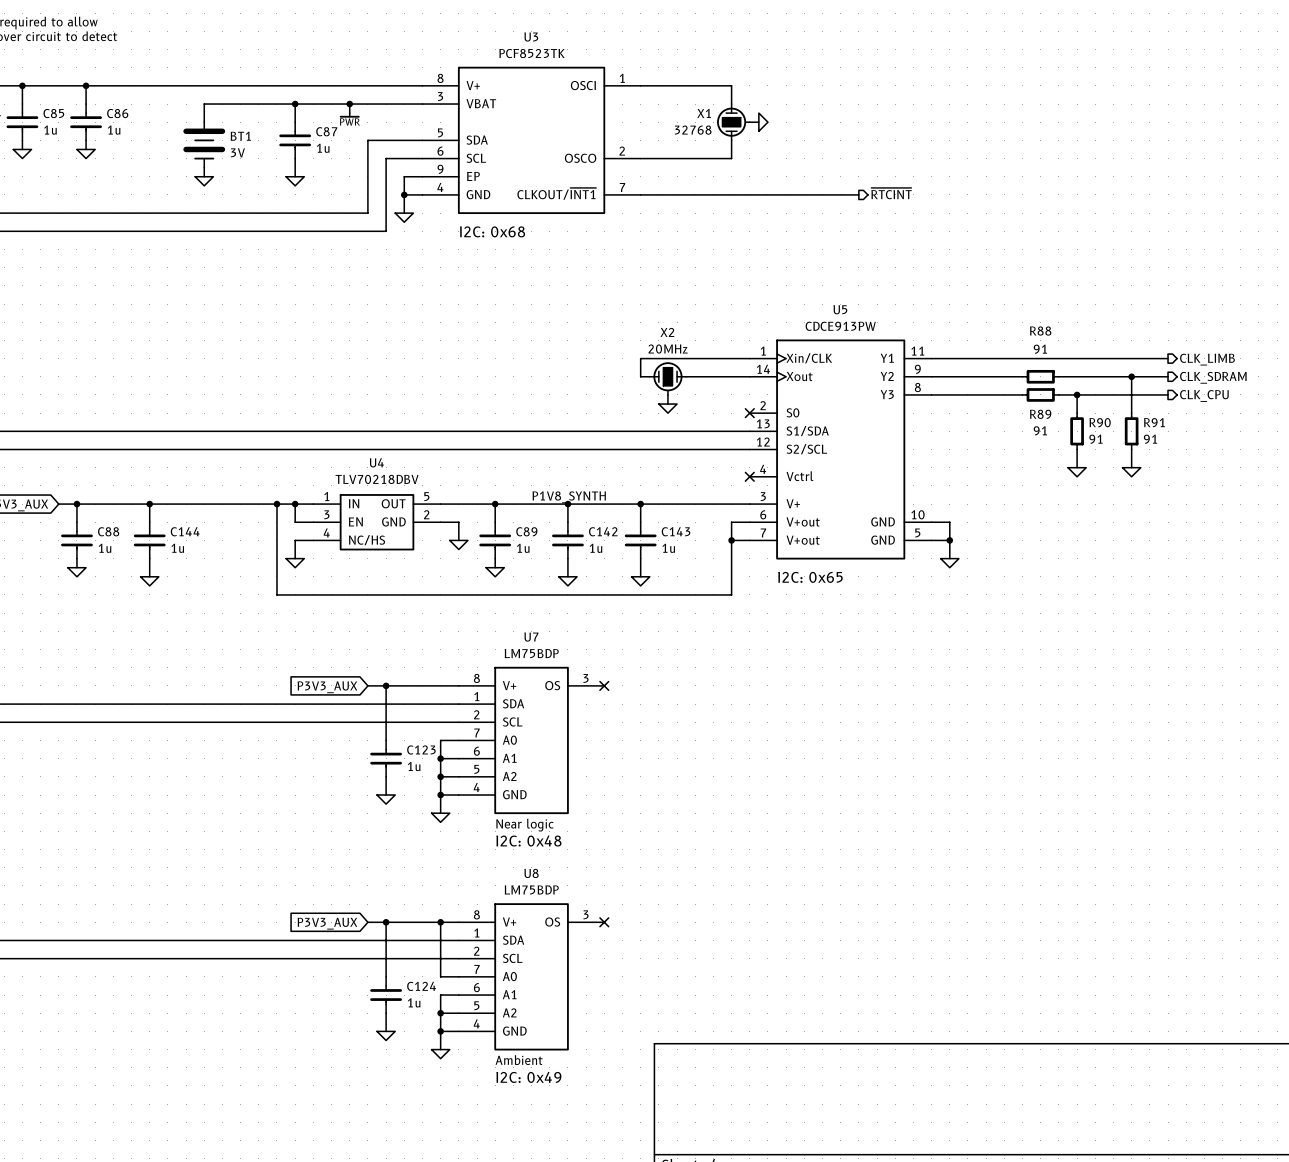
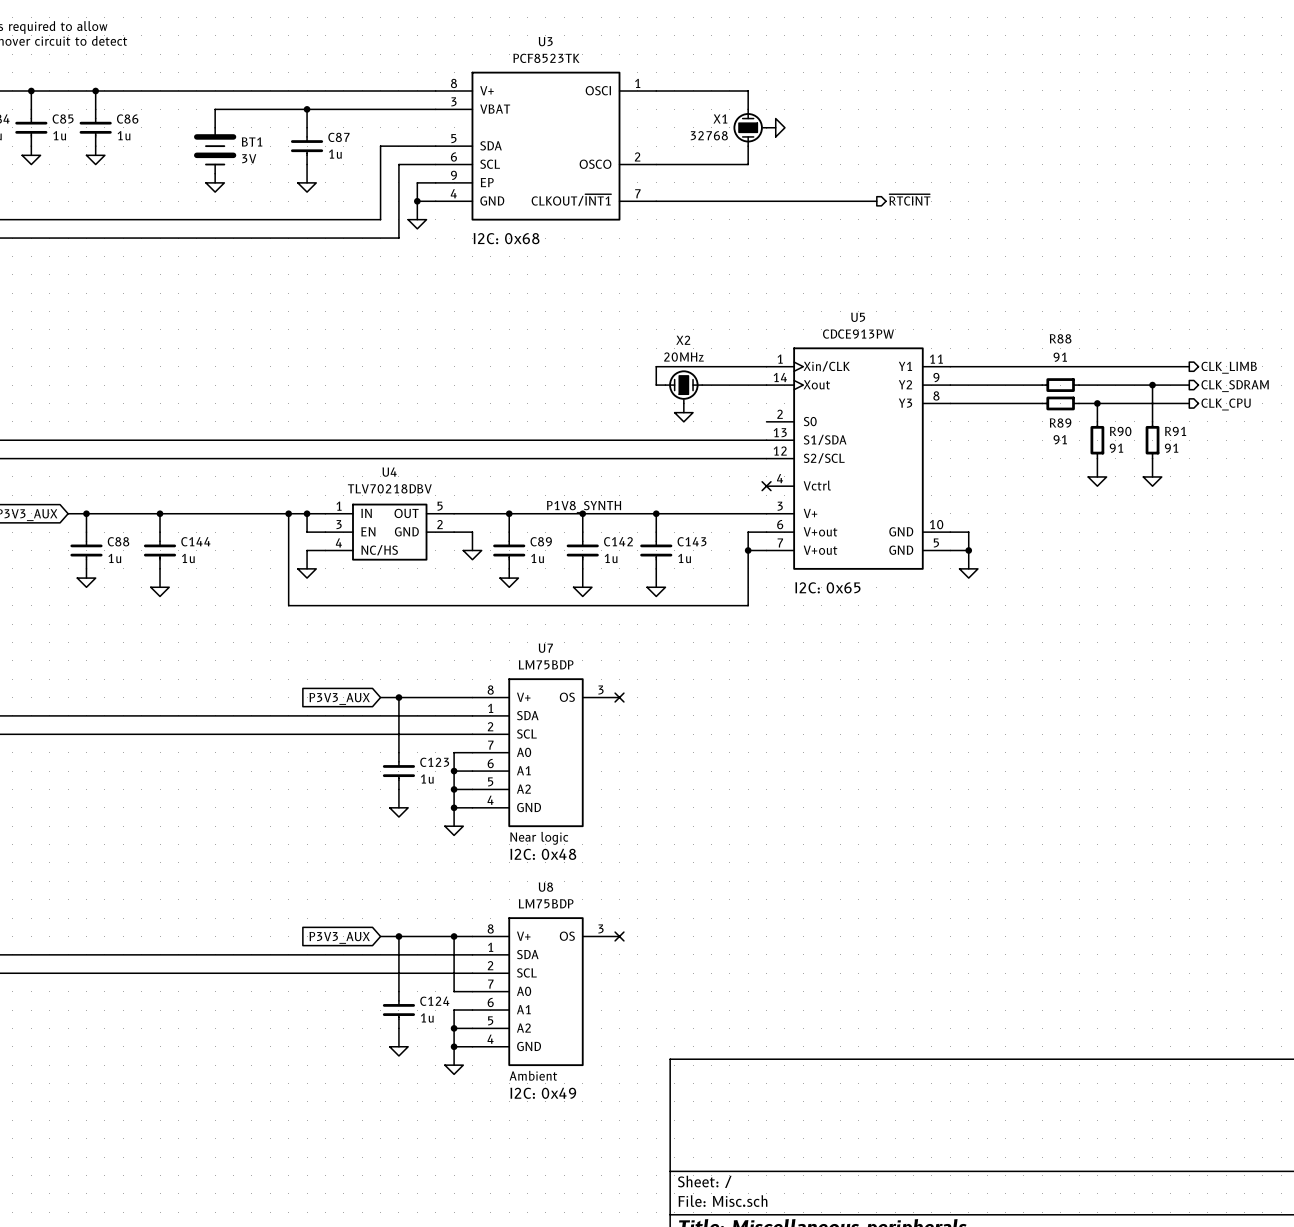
wire: (349, 104) (349, 113) -> none
junction: (349, 104) -> none
power symbol: (349, 115) -> none
no-connect mark: (749, 413) -> none

